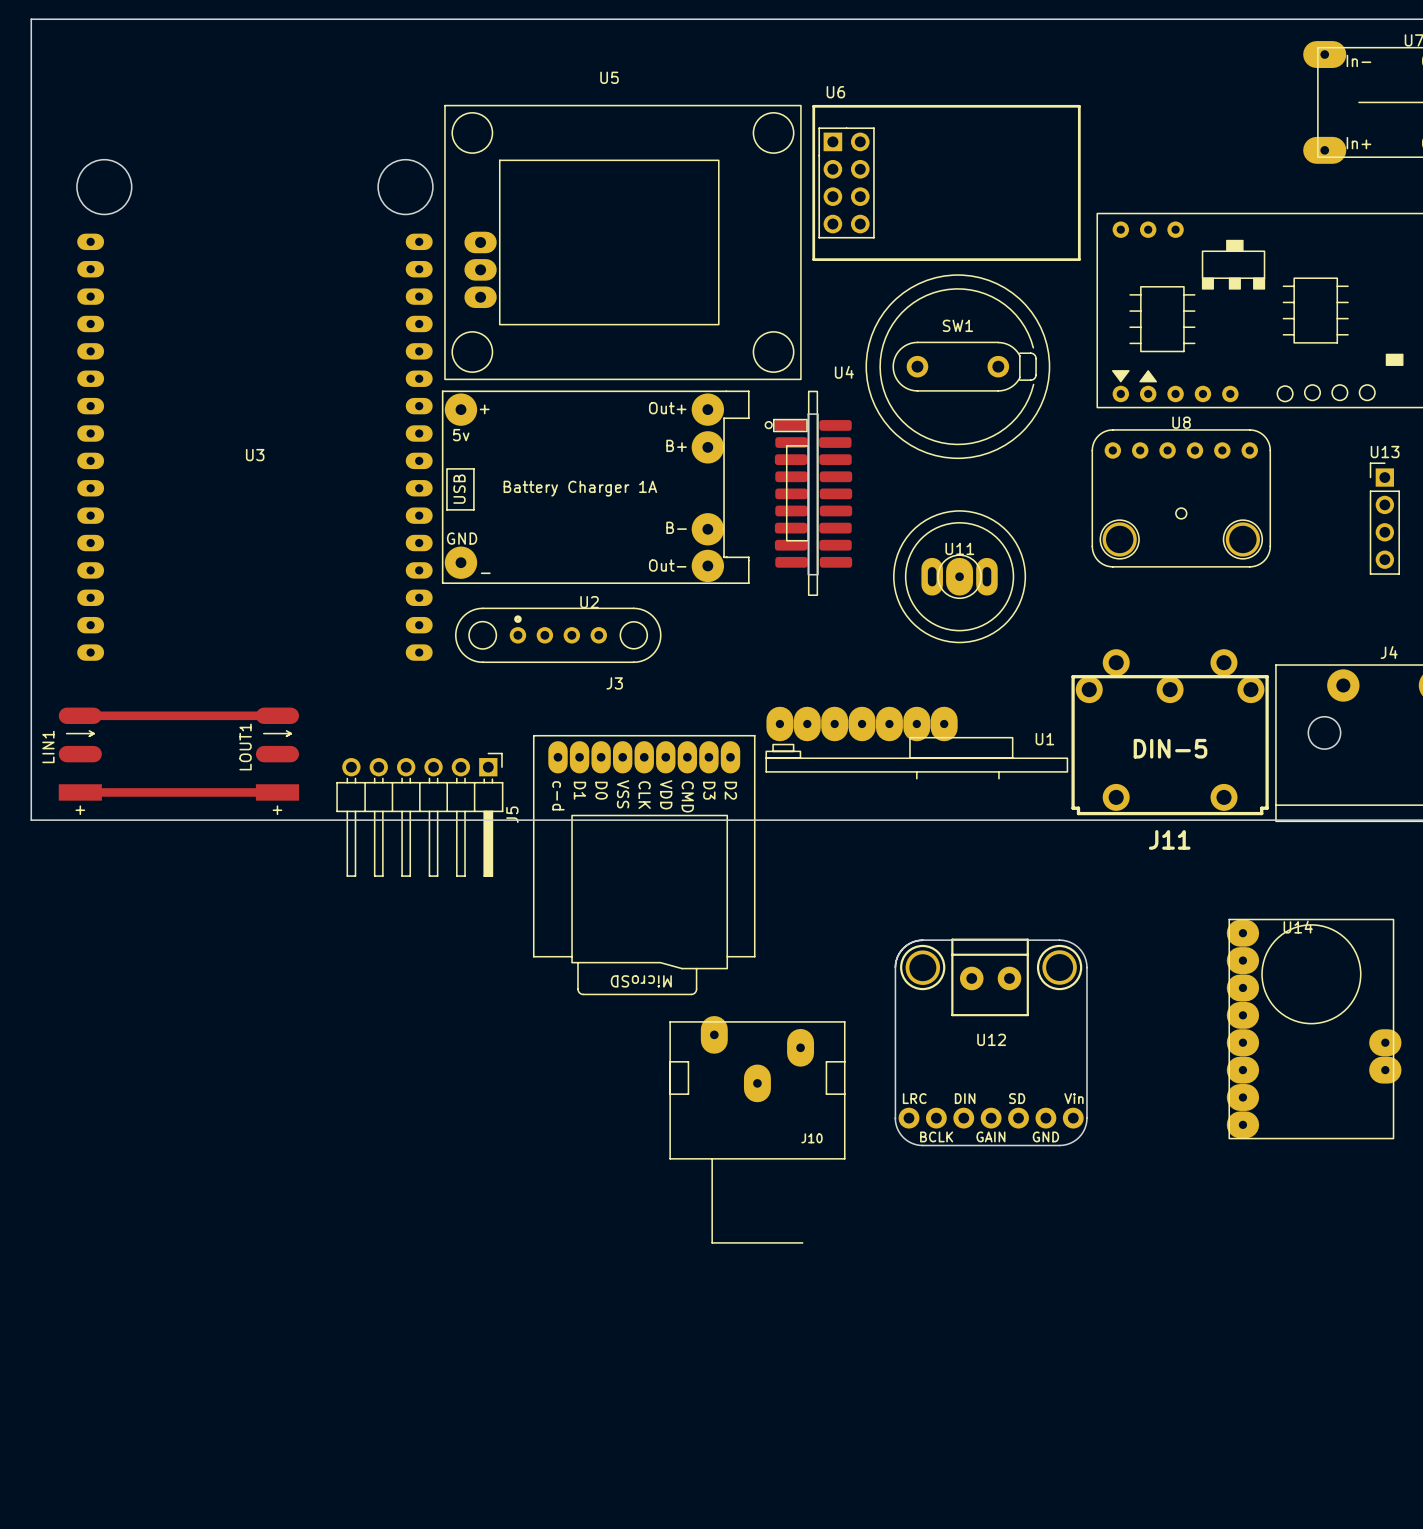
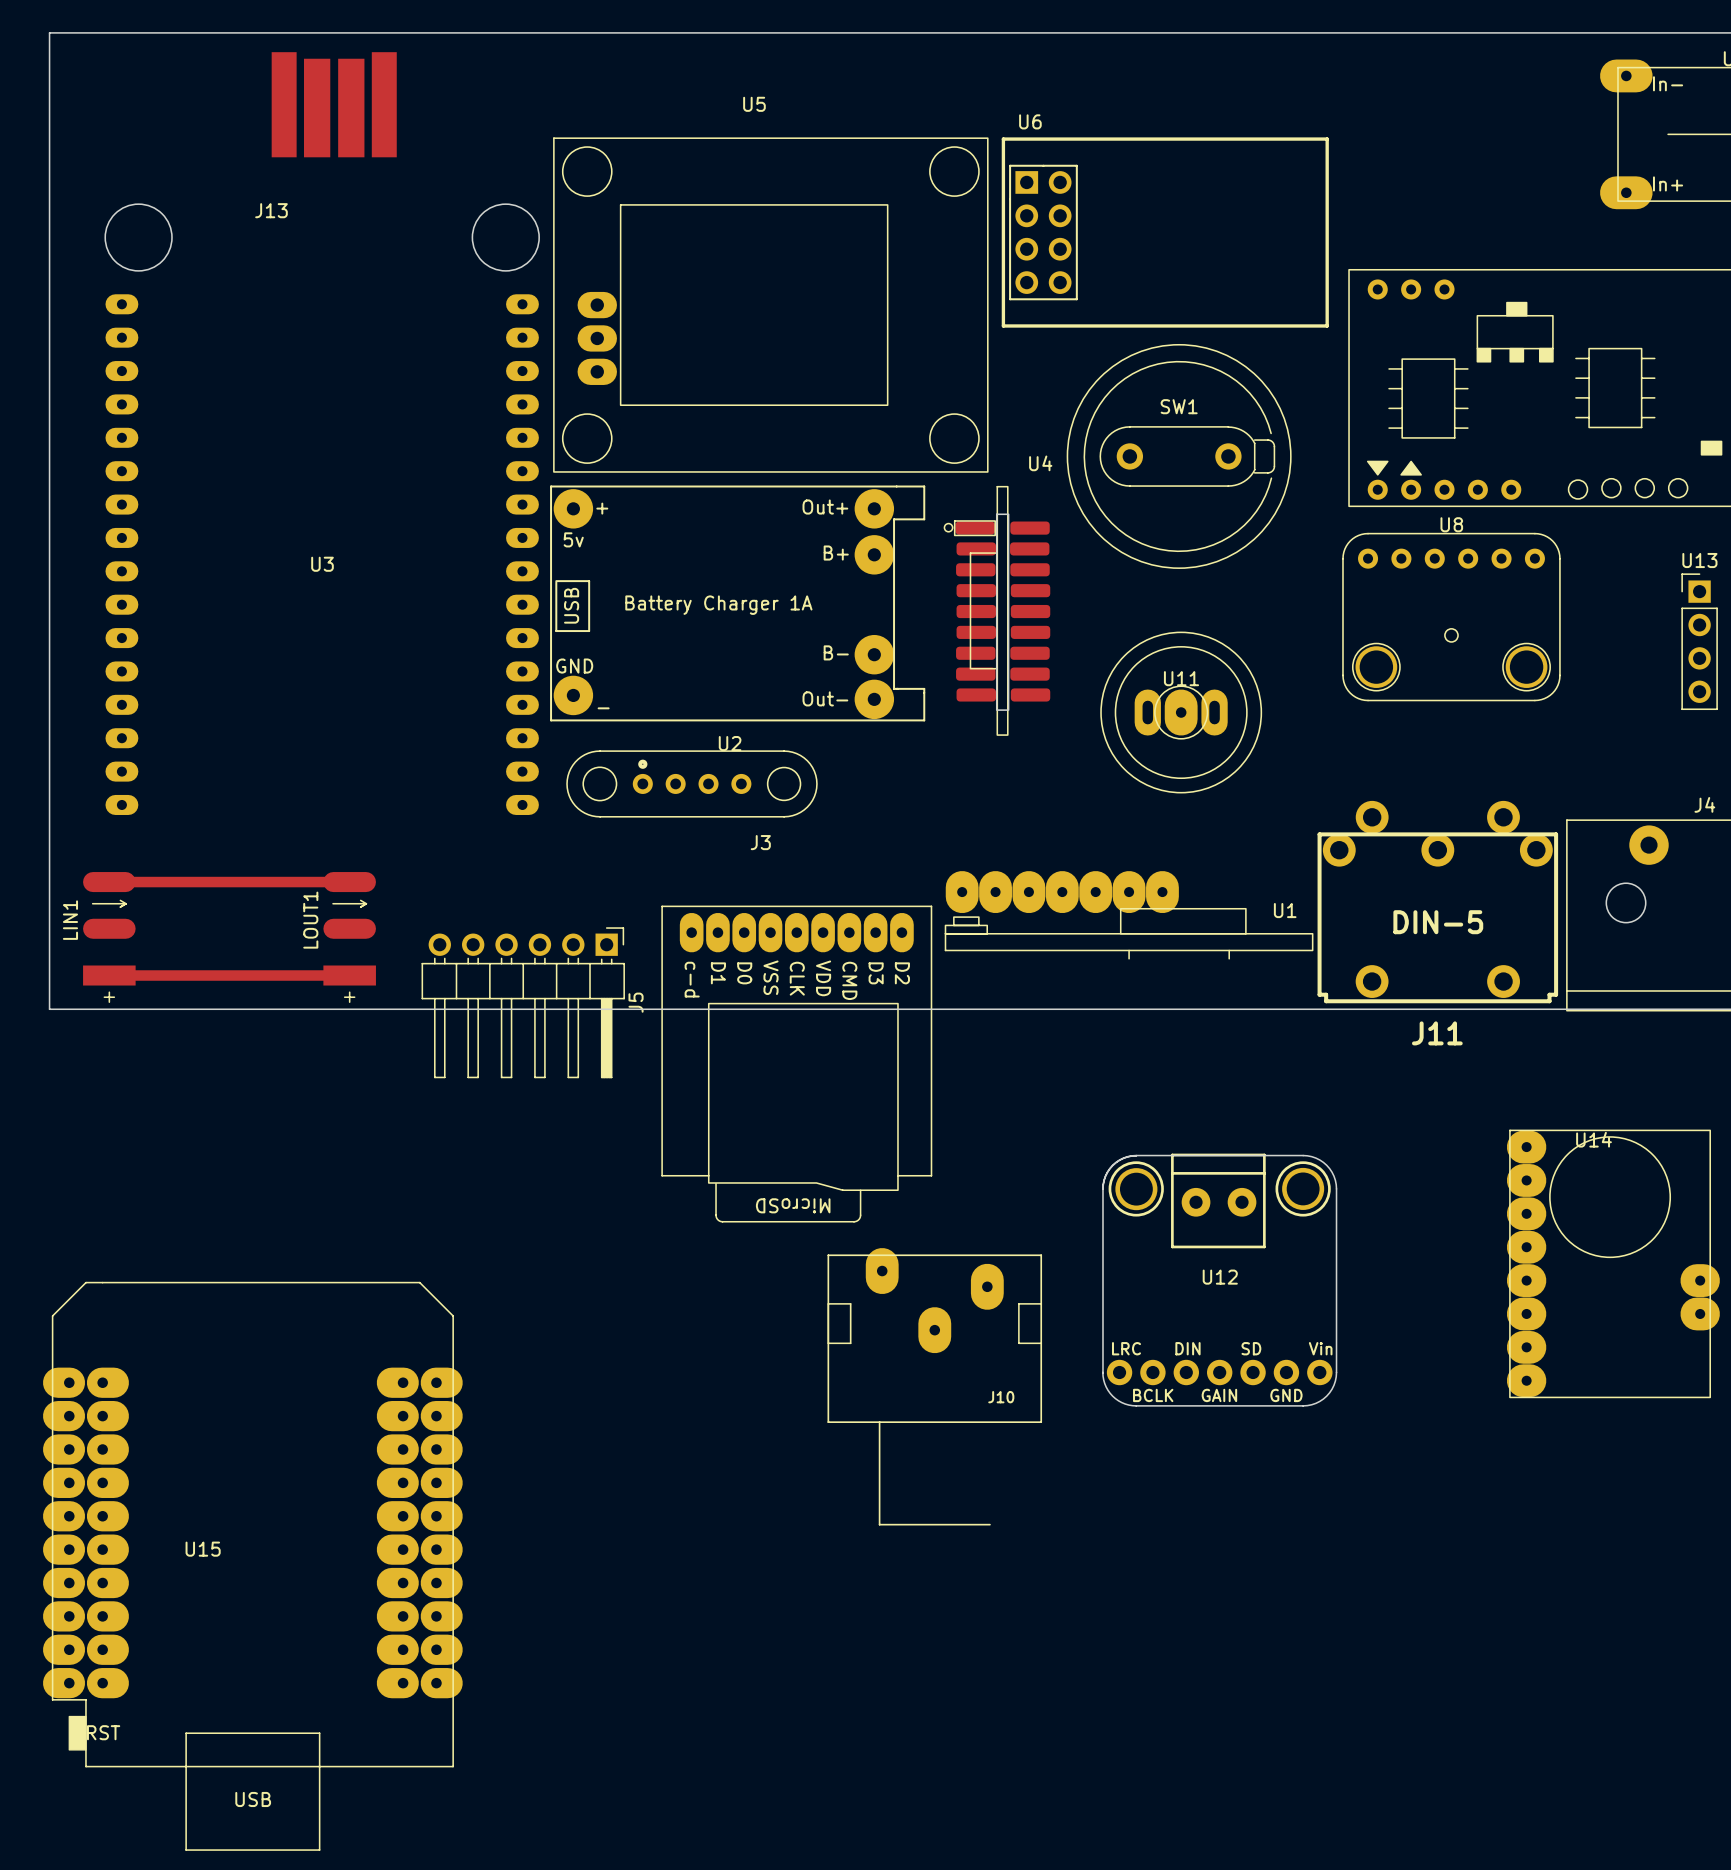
J13: none -> (334, 104)
U15: none -> (252, 1566)

